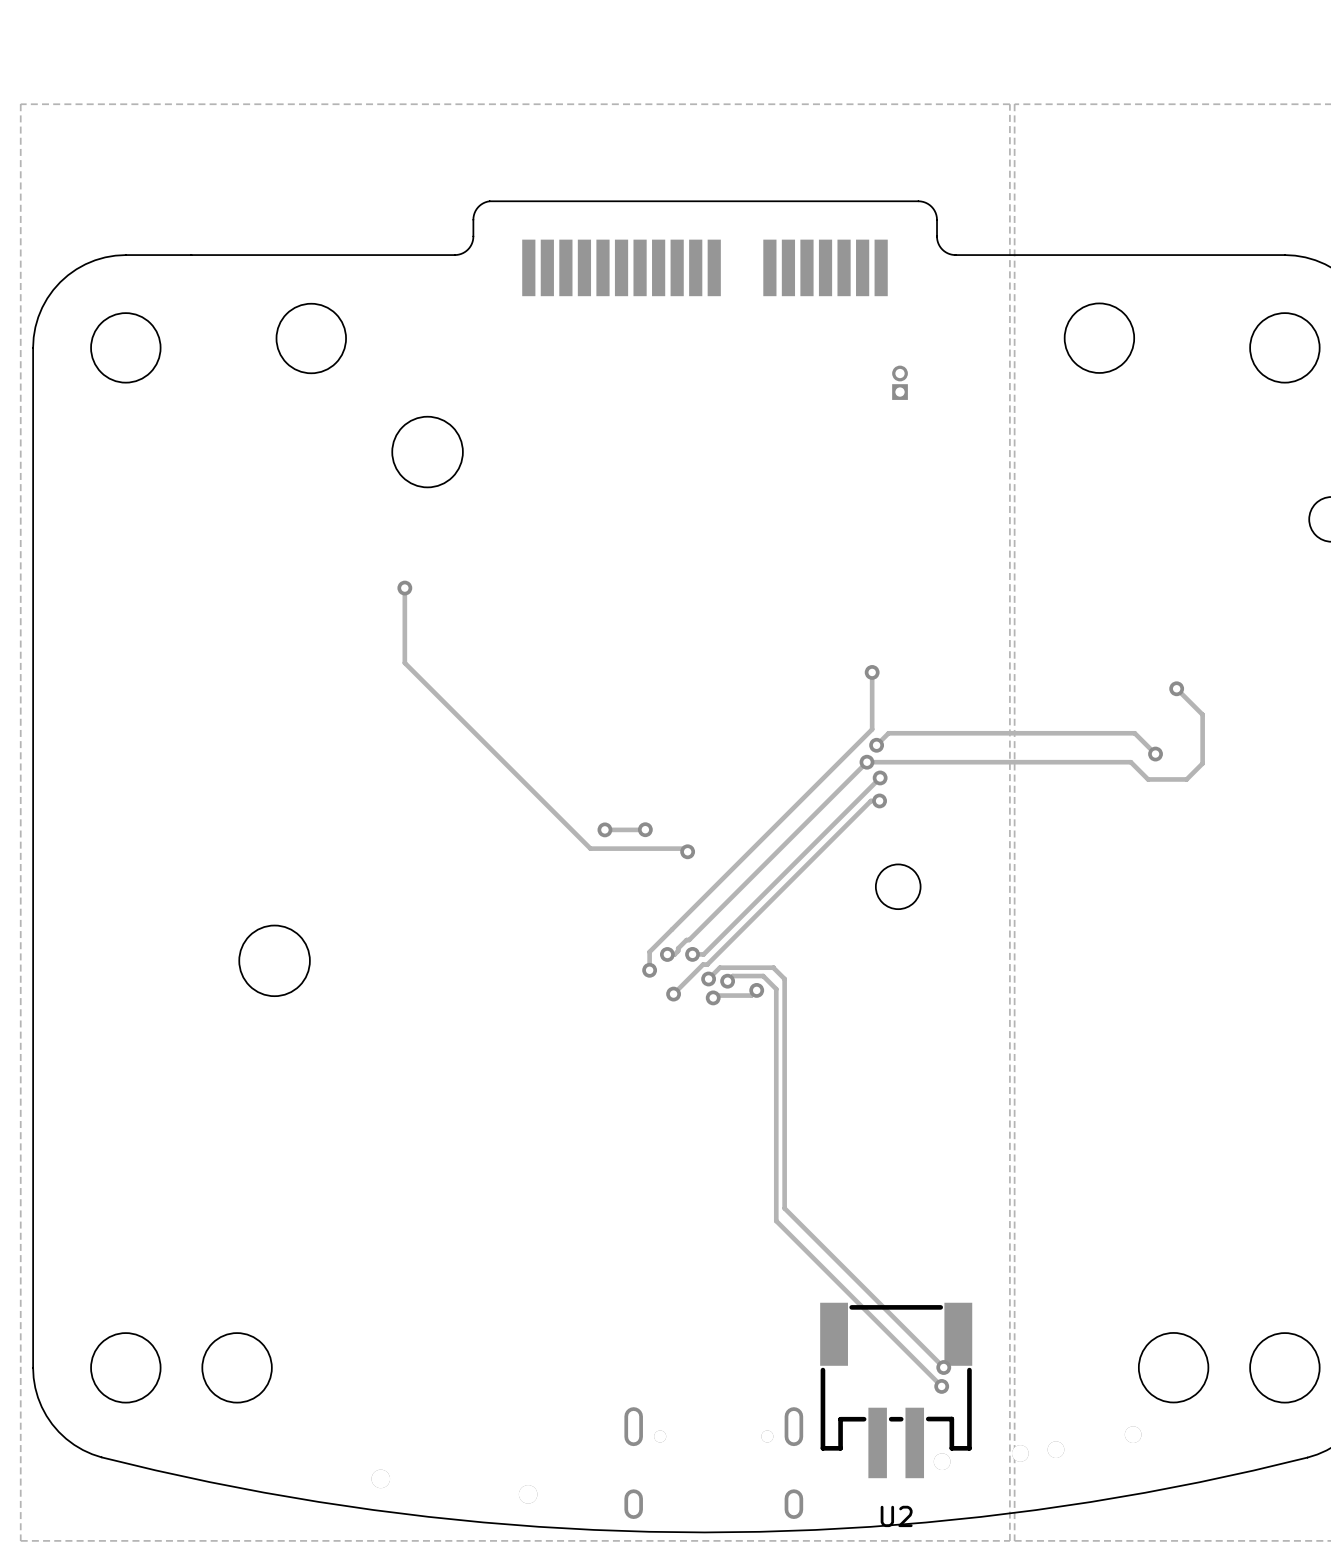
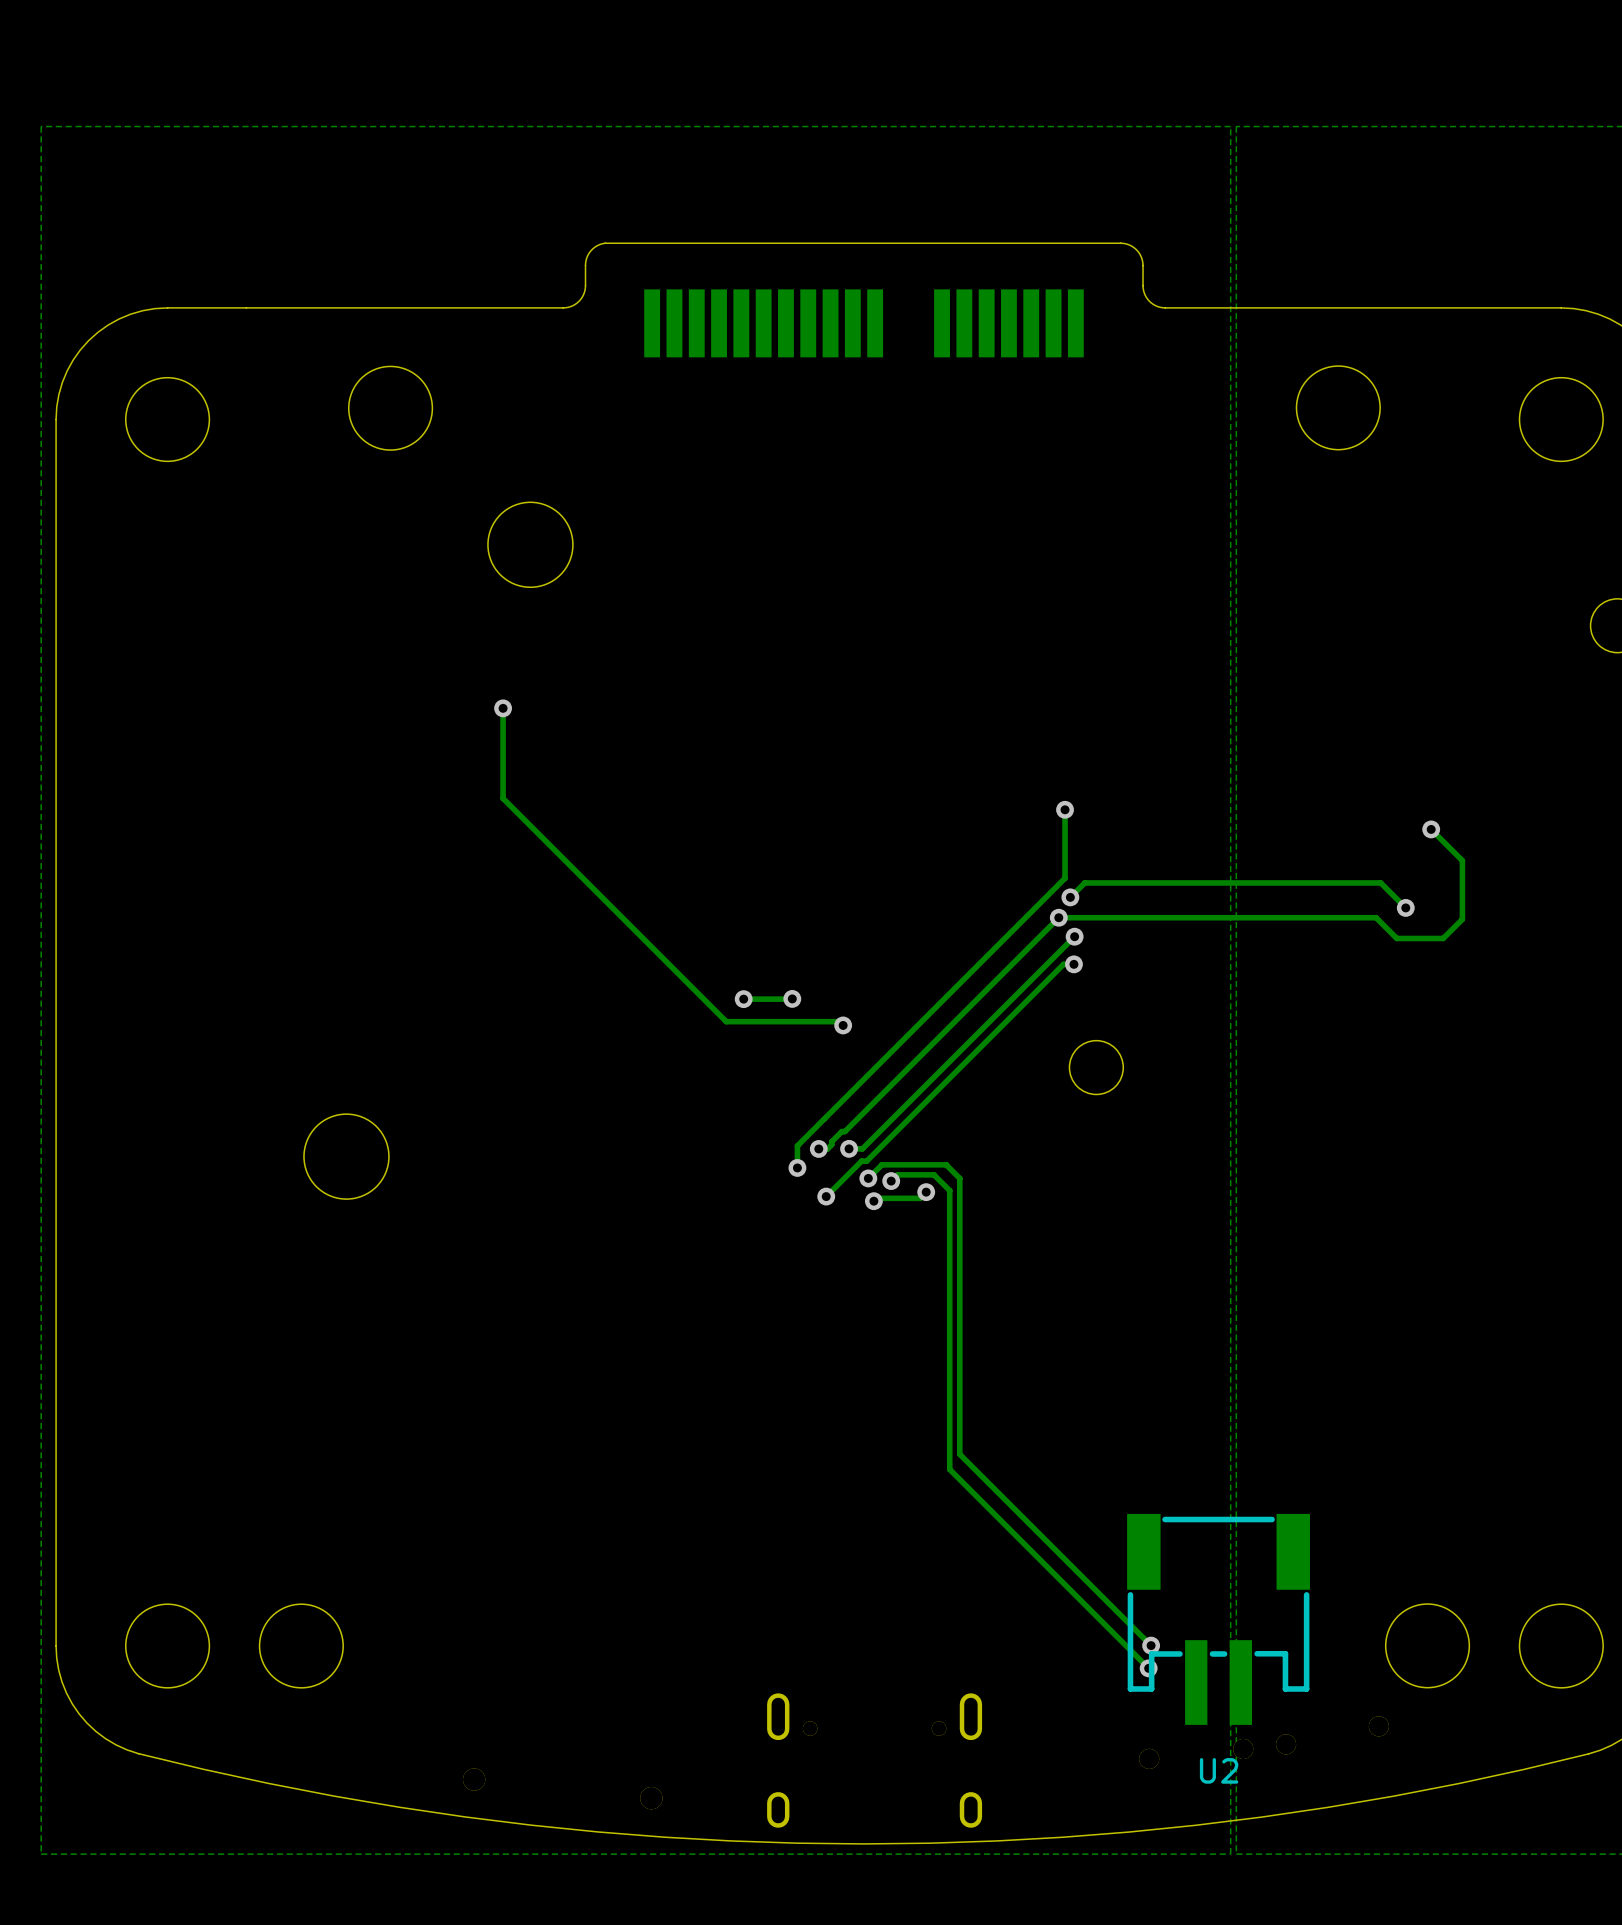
part: (900, 382) -> none
U2 position: (896, 1390) -> (1218, 1619)

